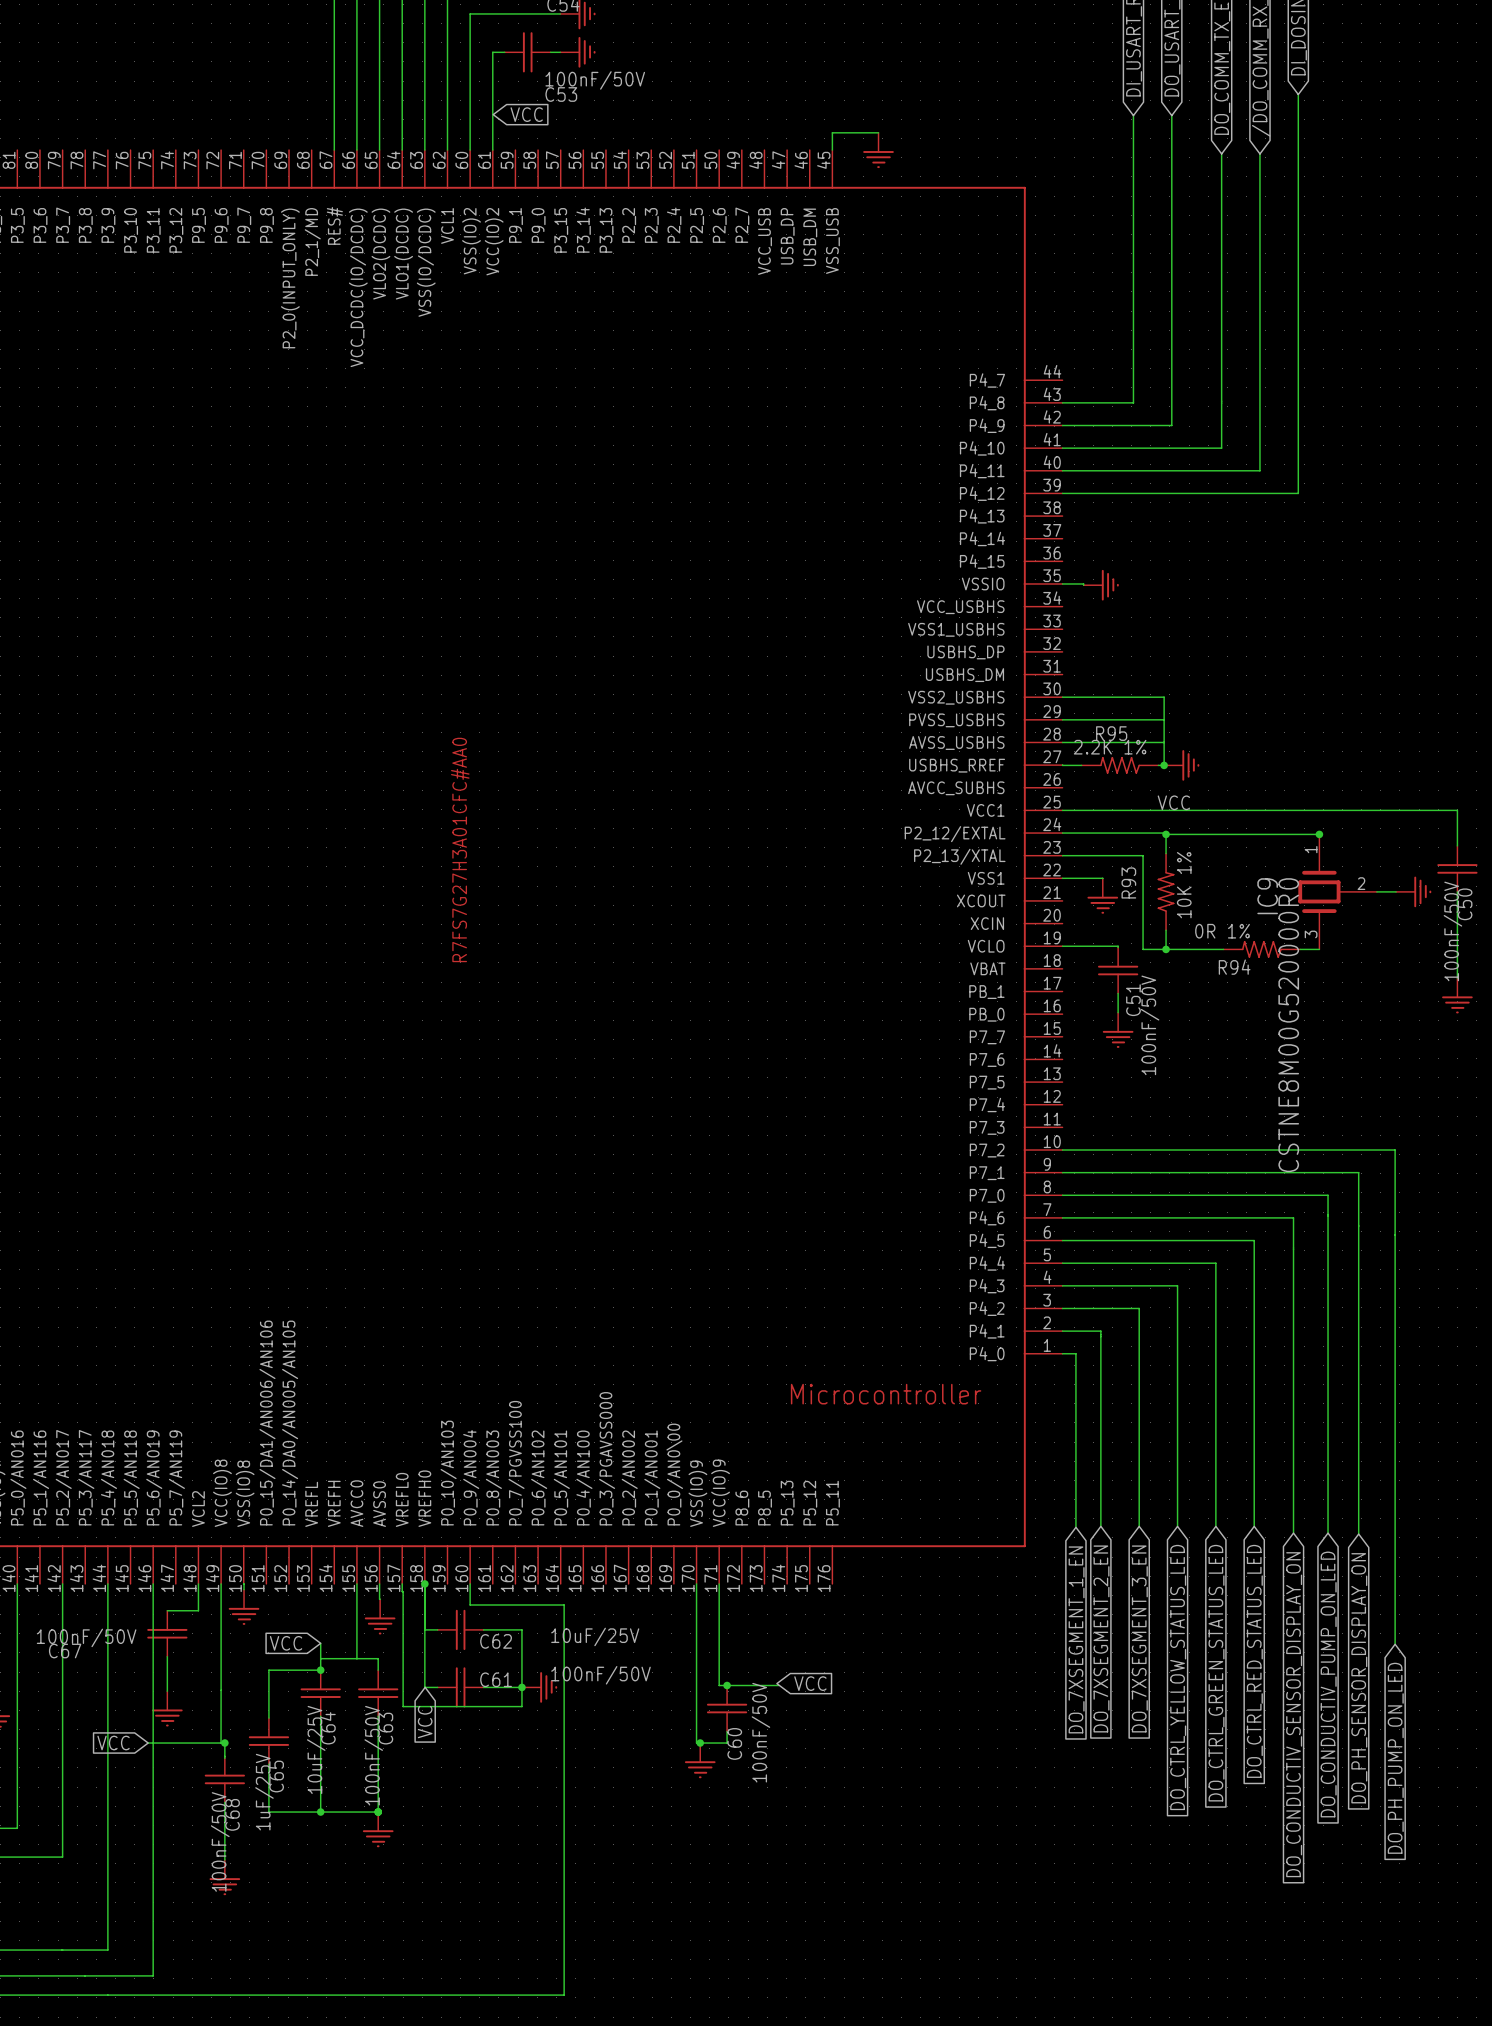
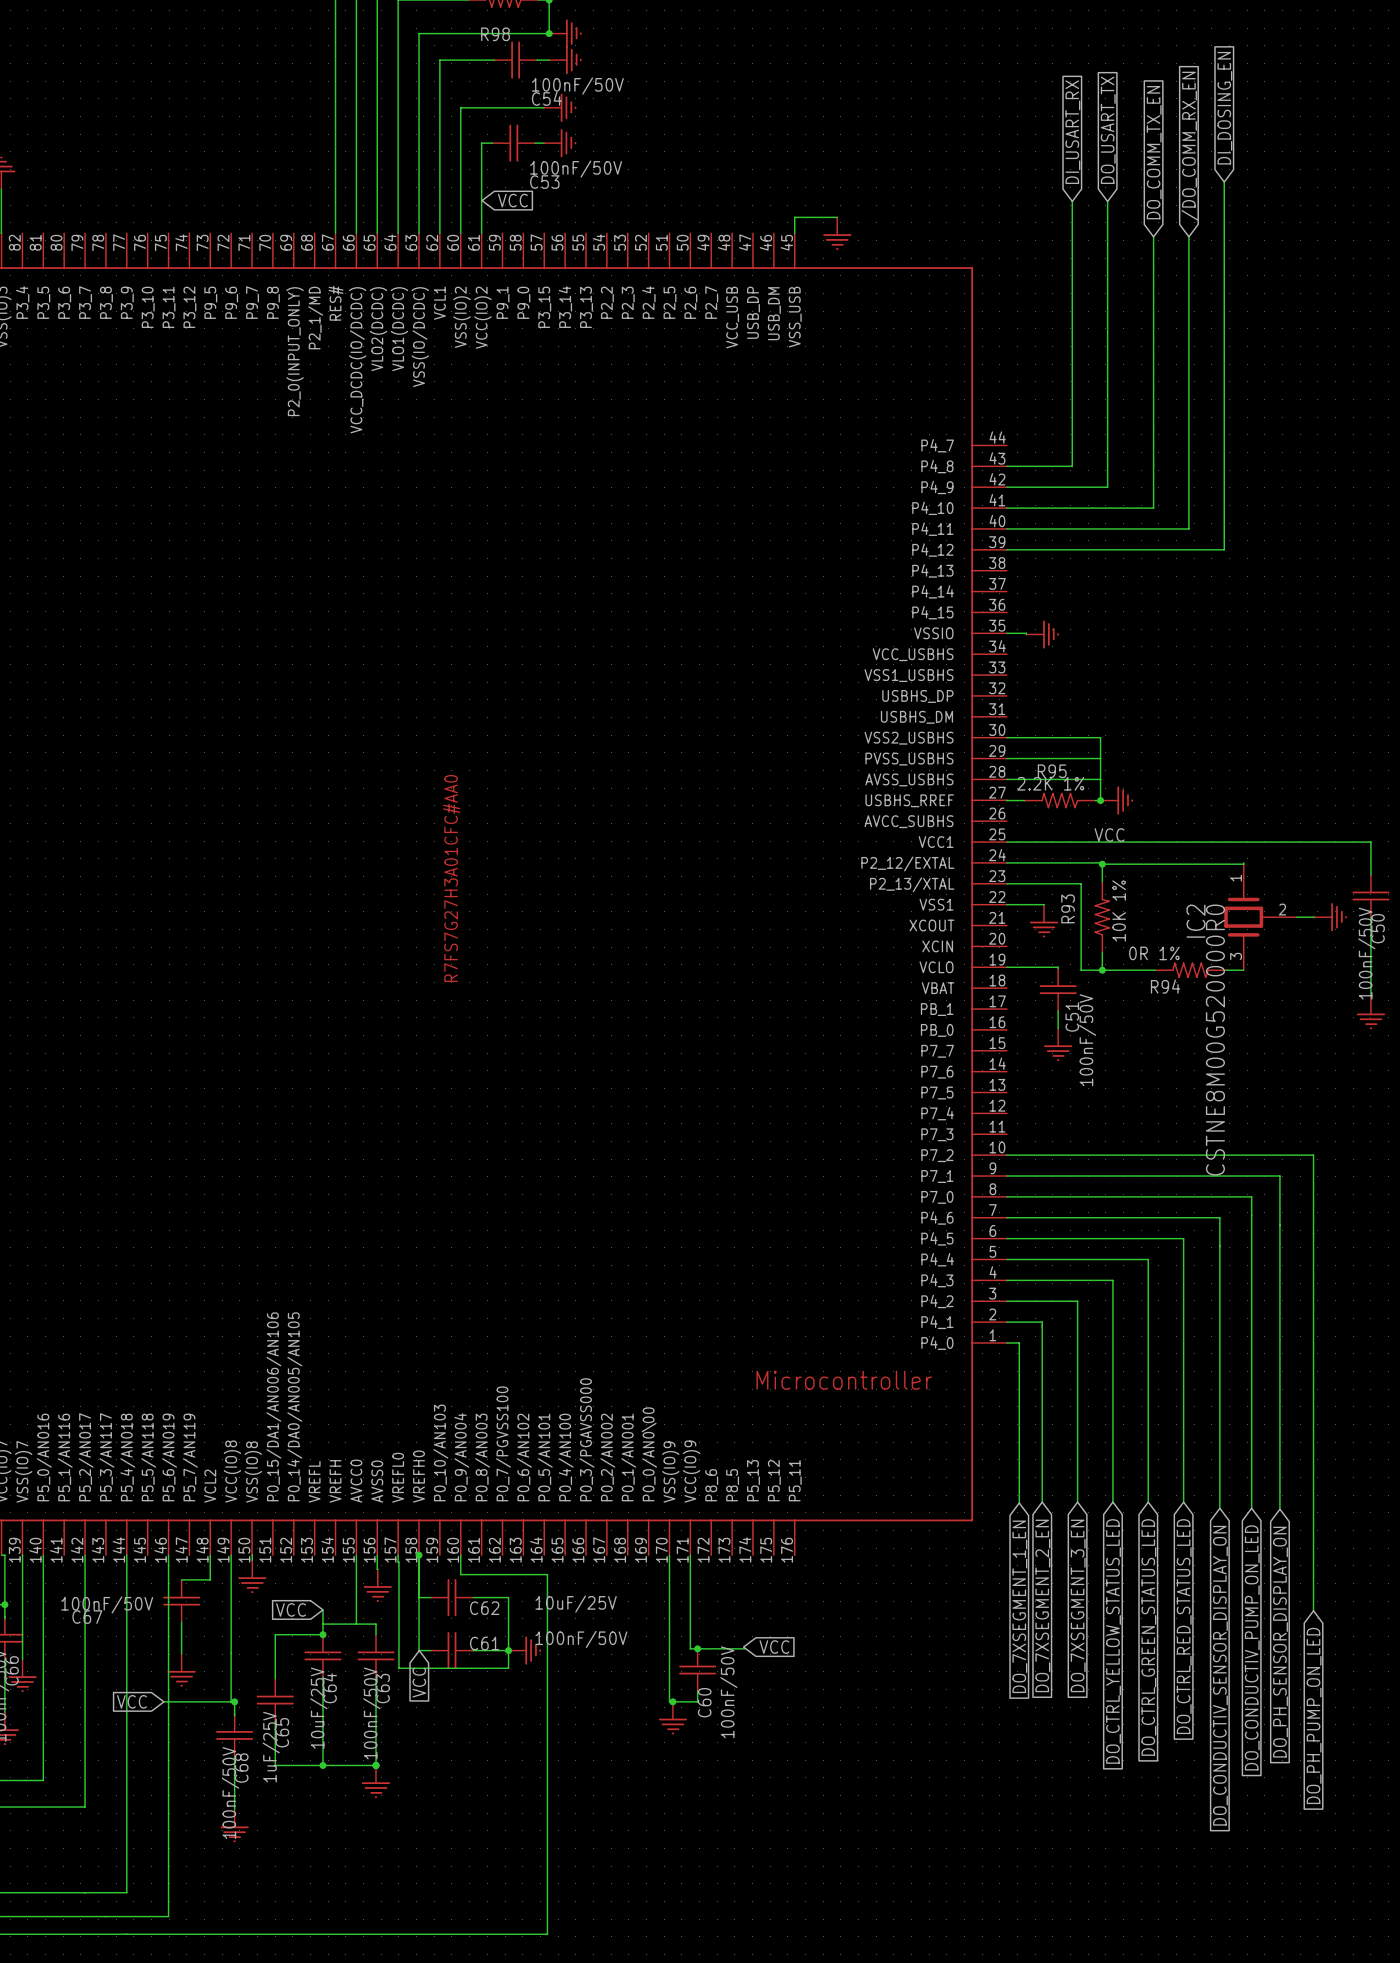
junction: (1319, 834) -> none
IC9 name: IC9 (1267, 896) -> IC2 (1196, 921)

